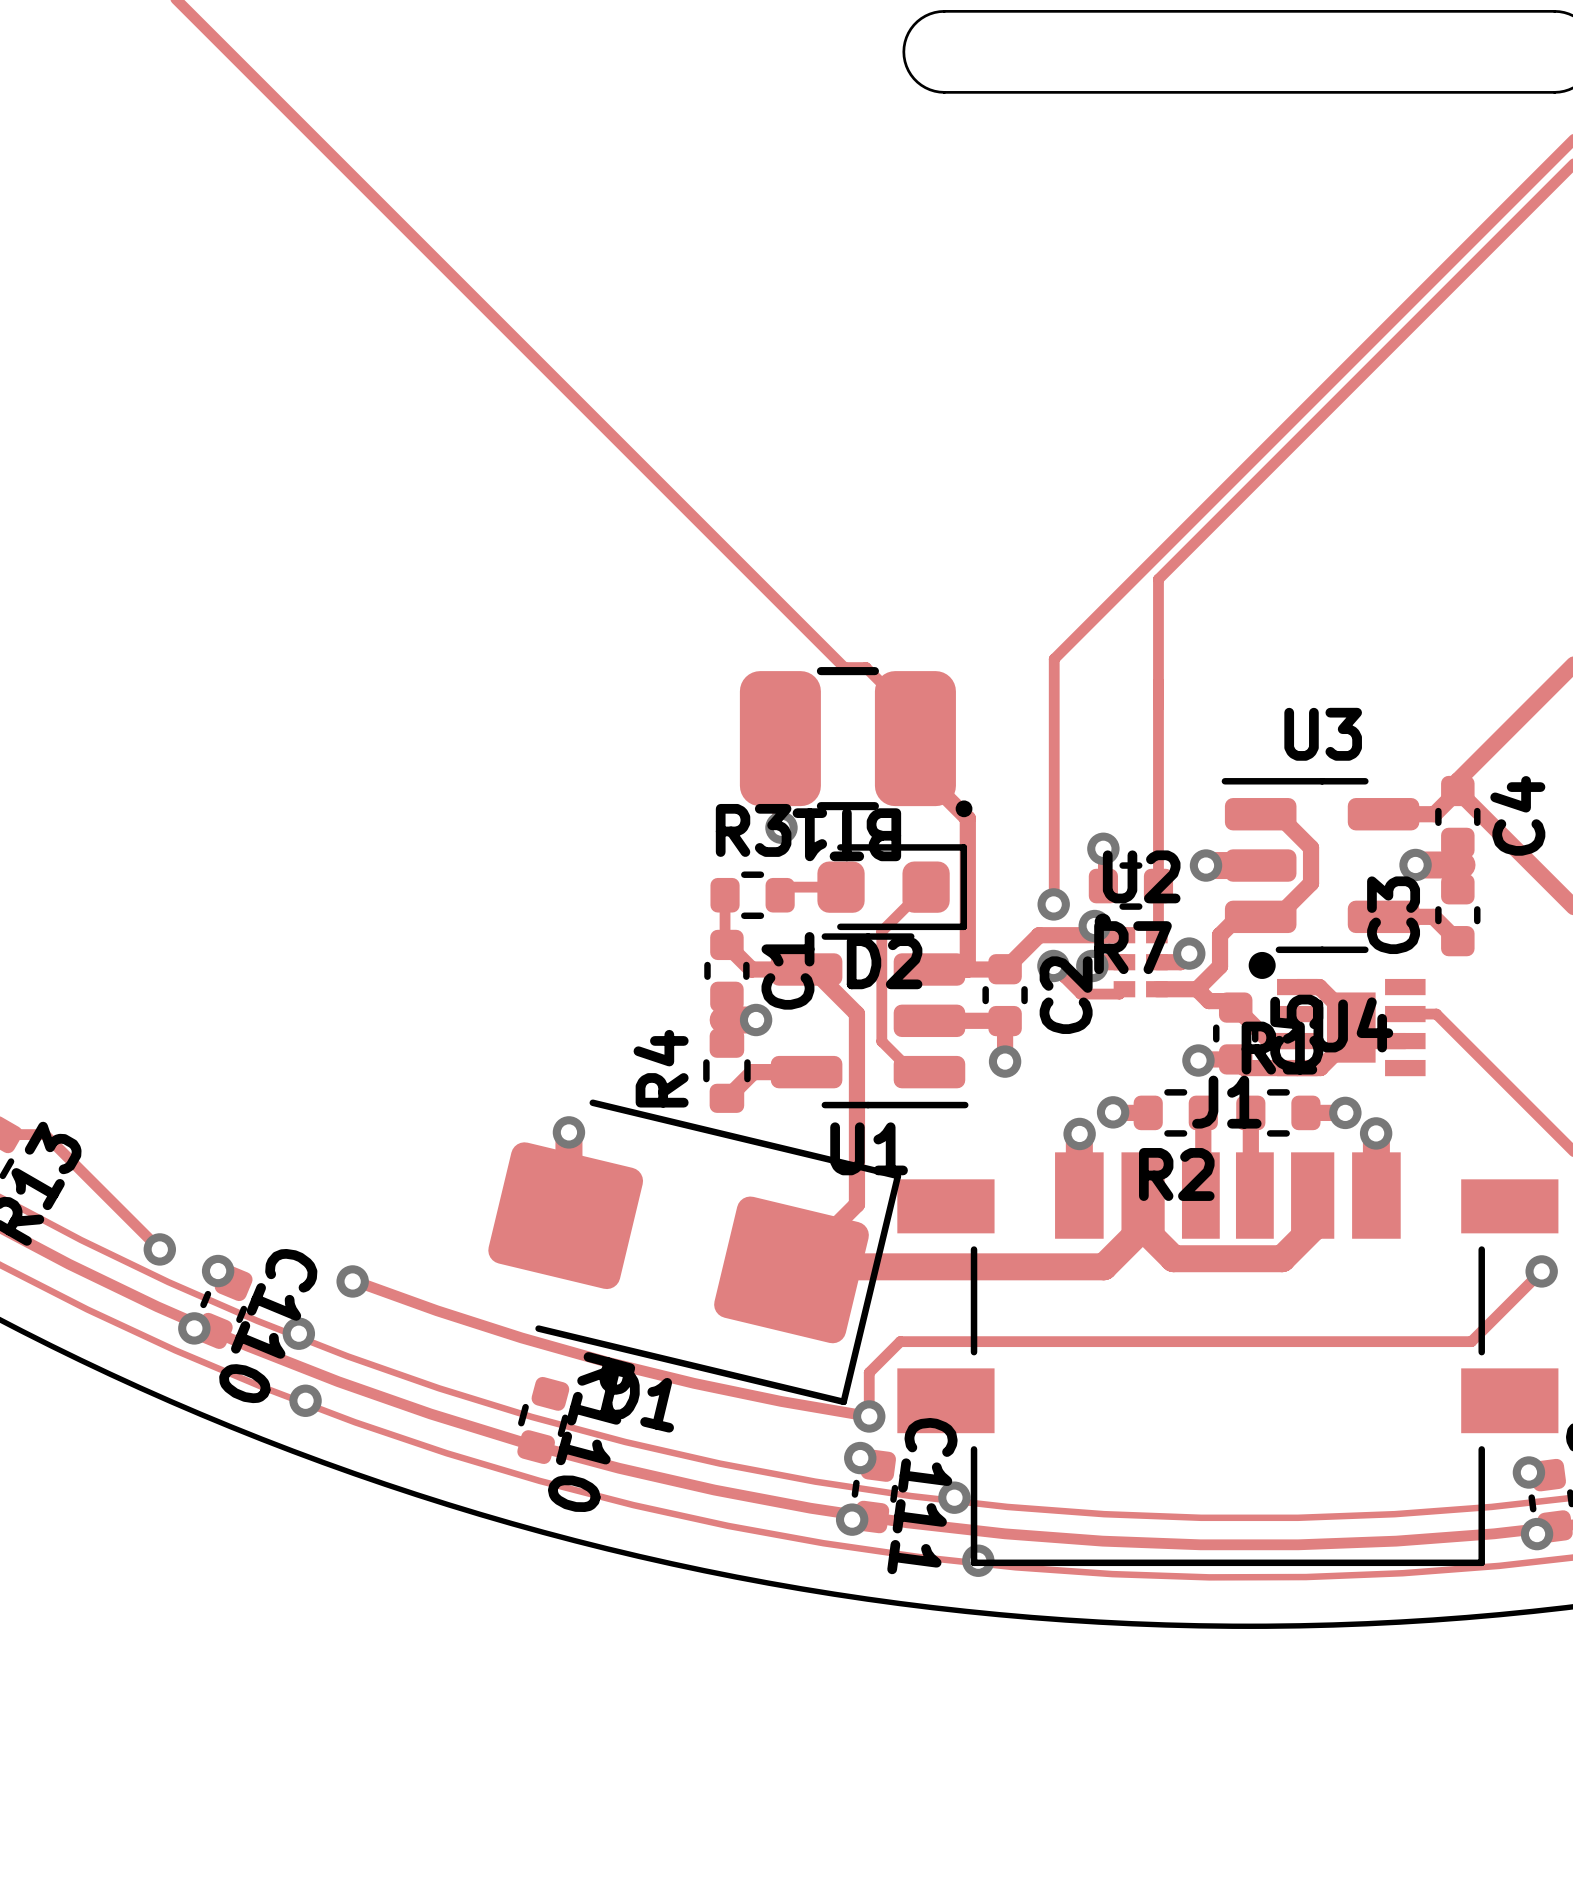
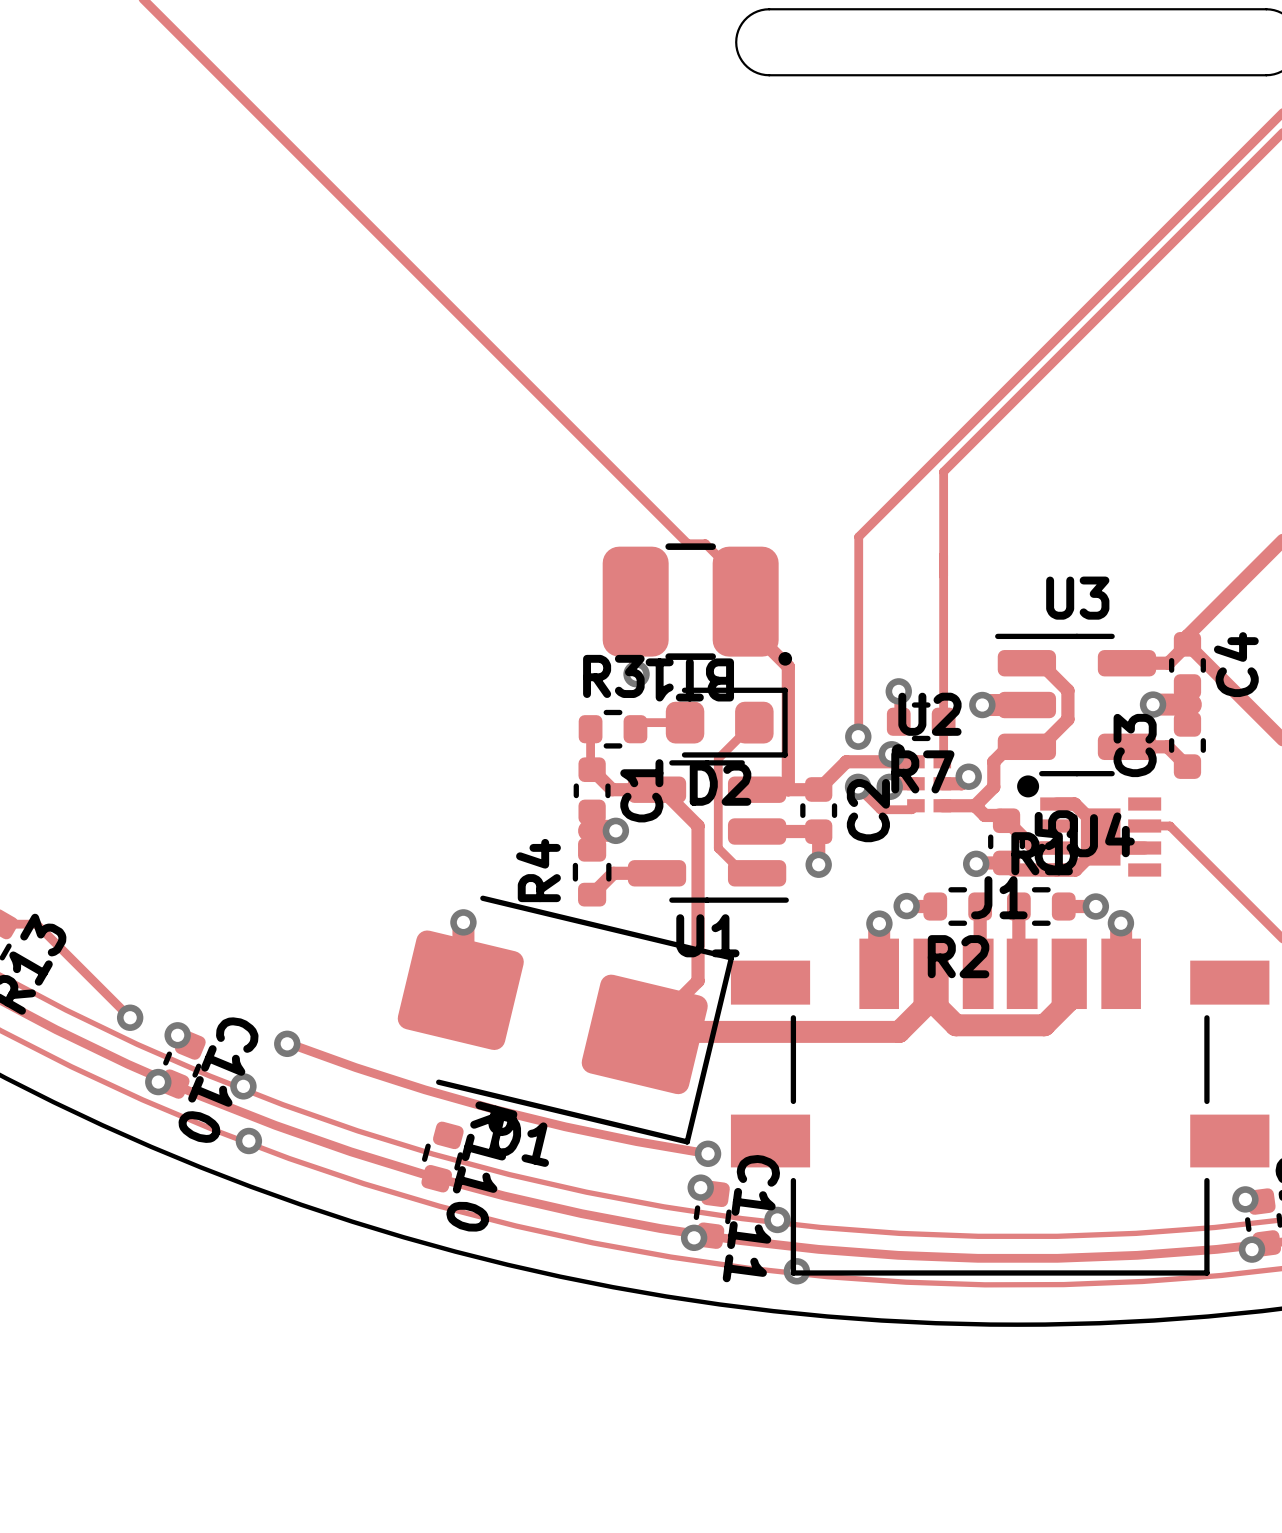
track: (1541, 1271) (1471, 1341) (900, 1341) (869, 1372) (869, 1416) -> none
via: (1541, 1271) -> none

